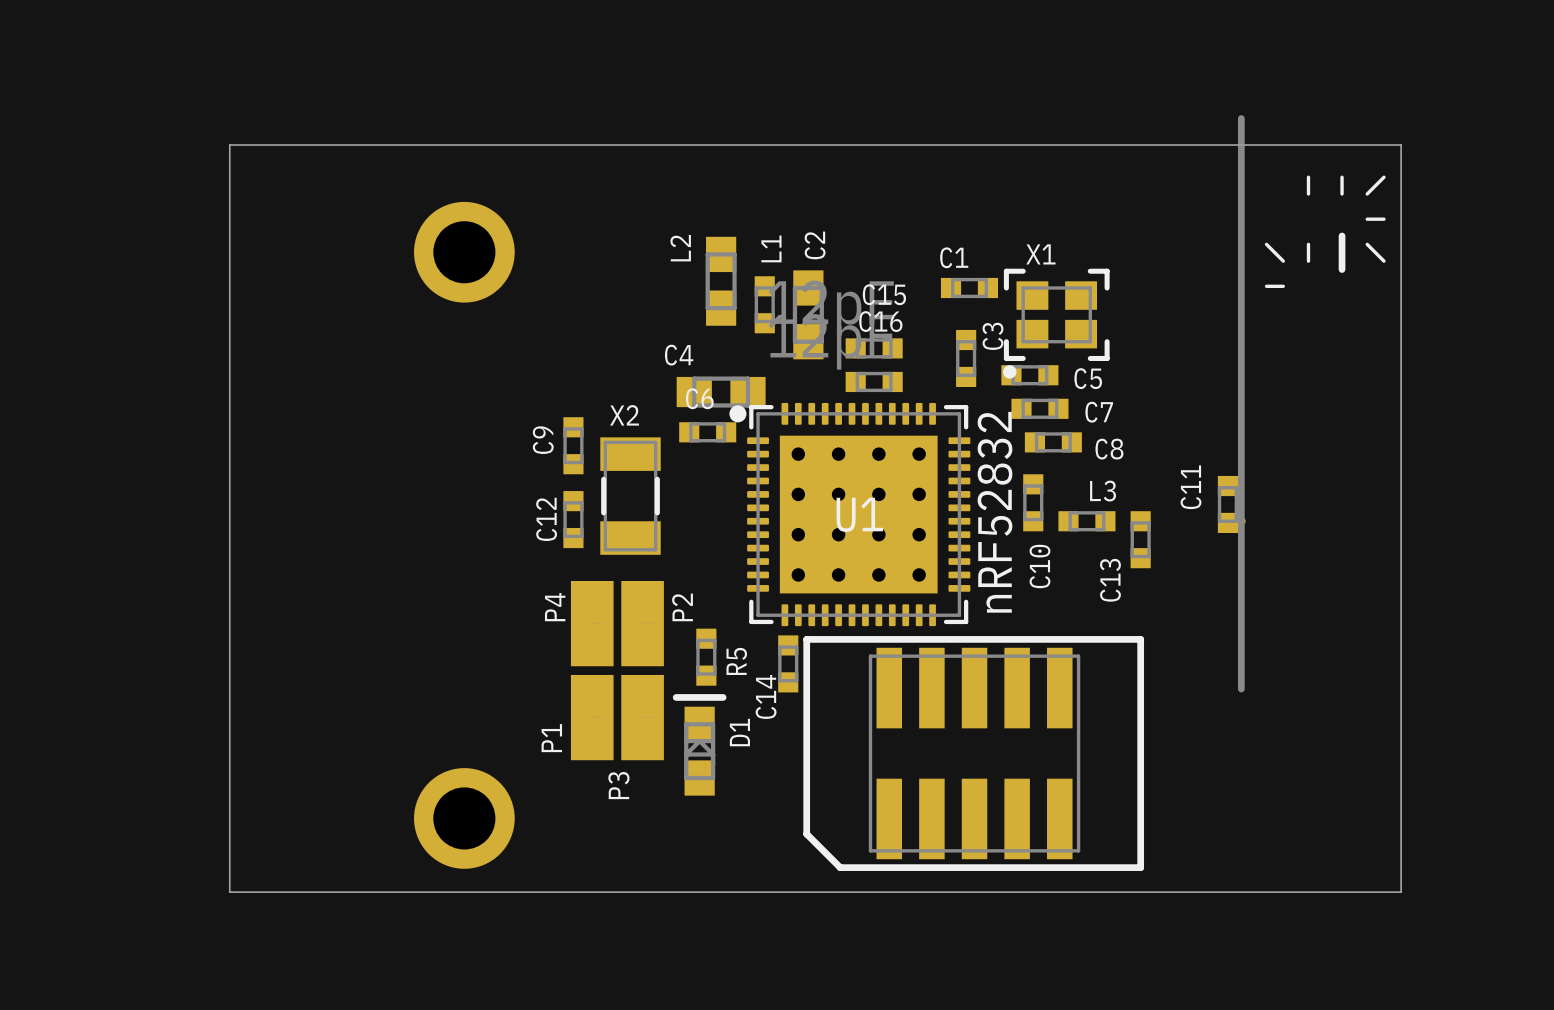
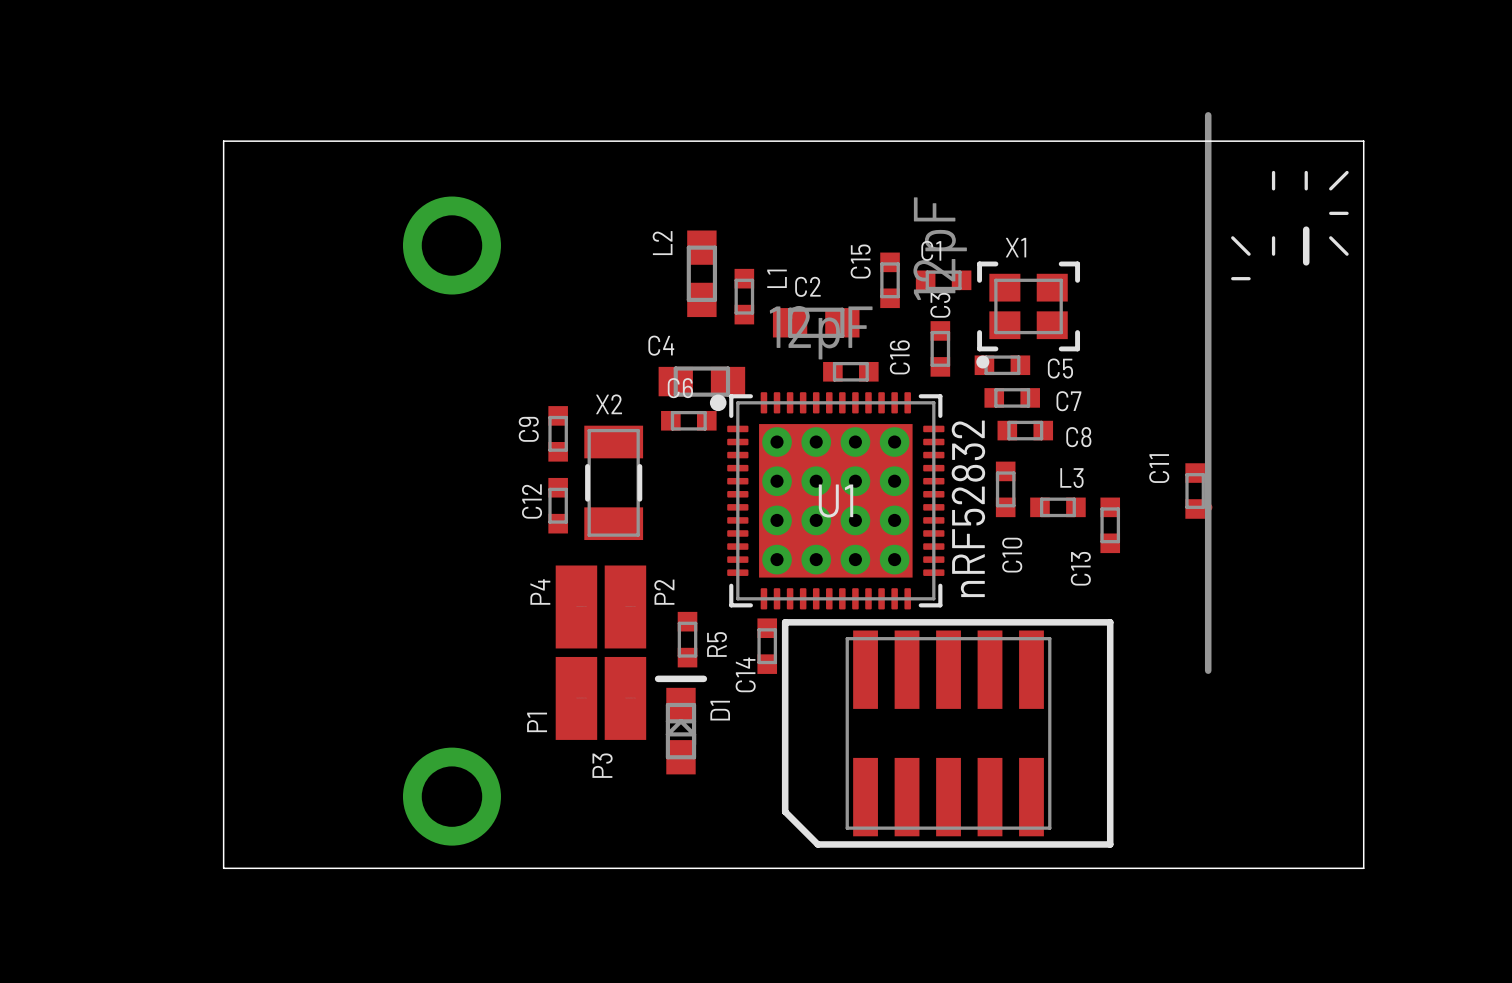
L1 name position: L1 (771, 248) -> L1 (777, 278)
C2 rotation: 0° (808, 314) -> 90° clockwise (816, 322)
C16 name rotation: 0° (880, 321) -> 90° counterclockwise (899, 357)
C16 name position: C16 (880, 321) -> C16 (899, 357)
C3 name position: C3 (992, 336) -> C3 (940, 305)
C15 rotation: 0° (874, 348) -> 90° clockwise (890, 280)
C15 position: (874, 348) -> (890, 280)

